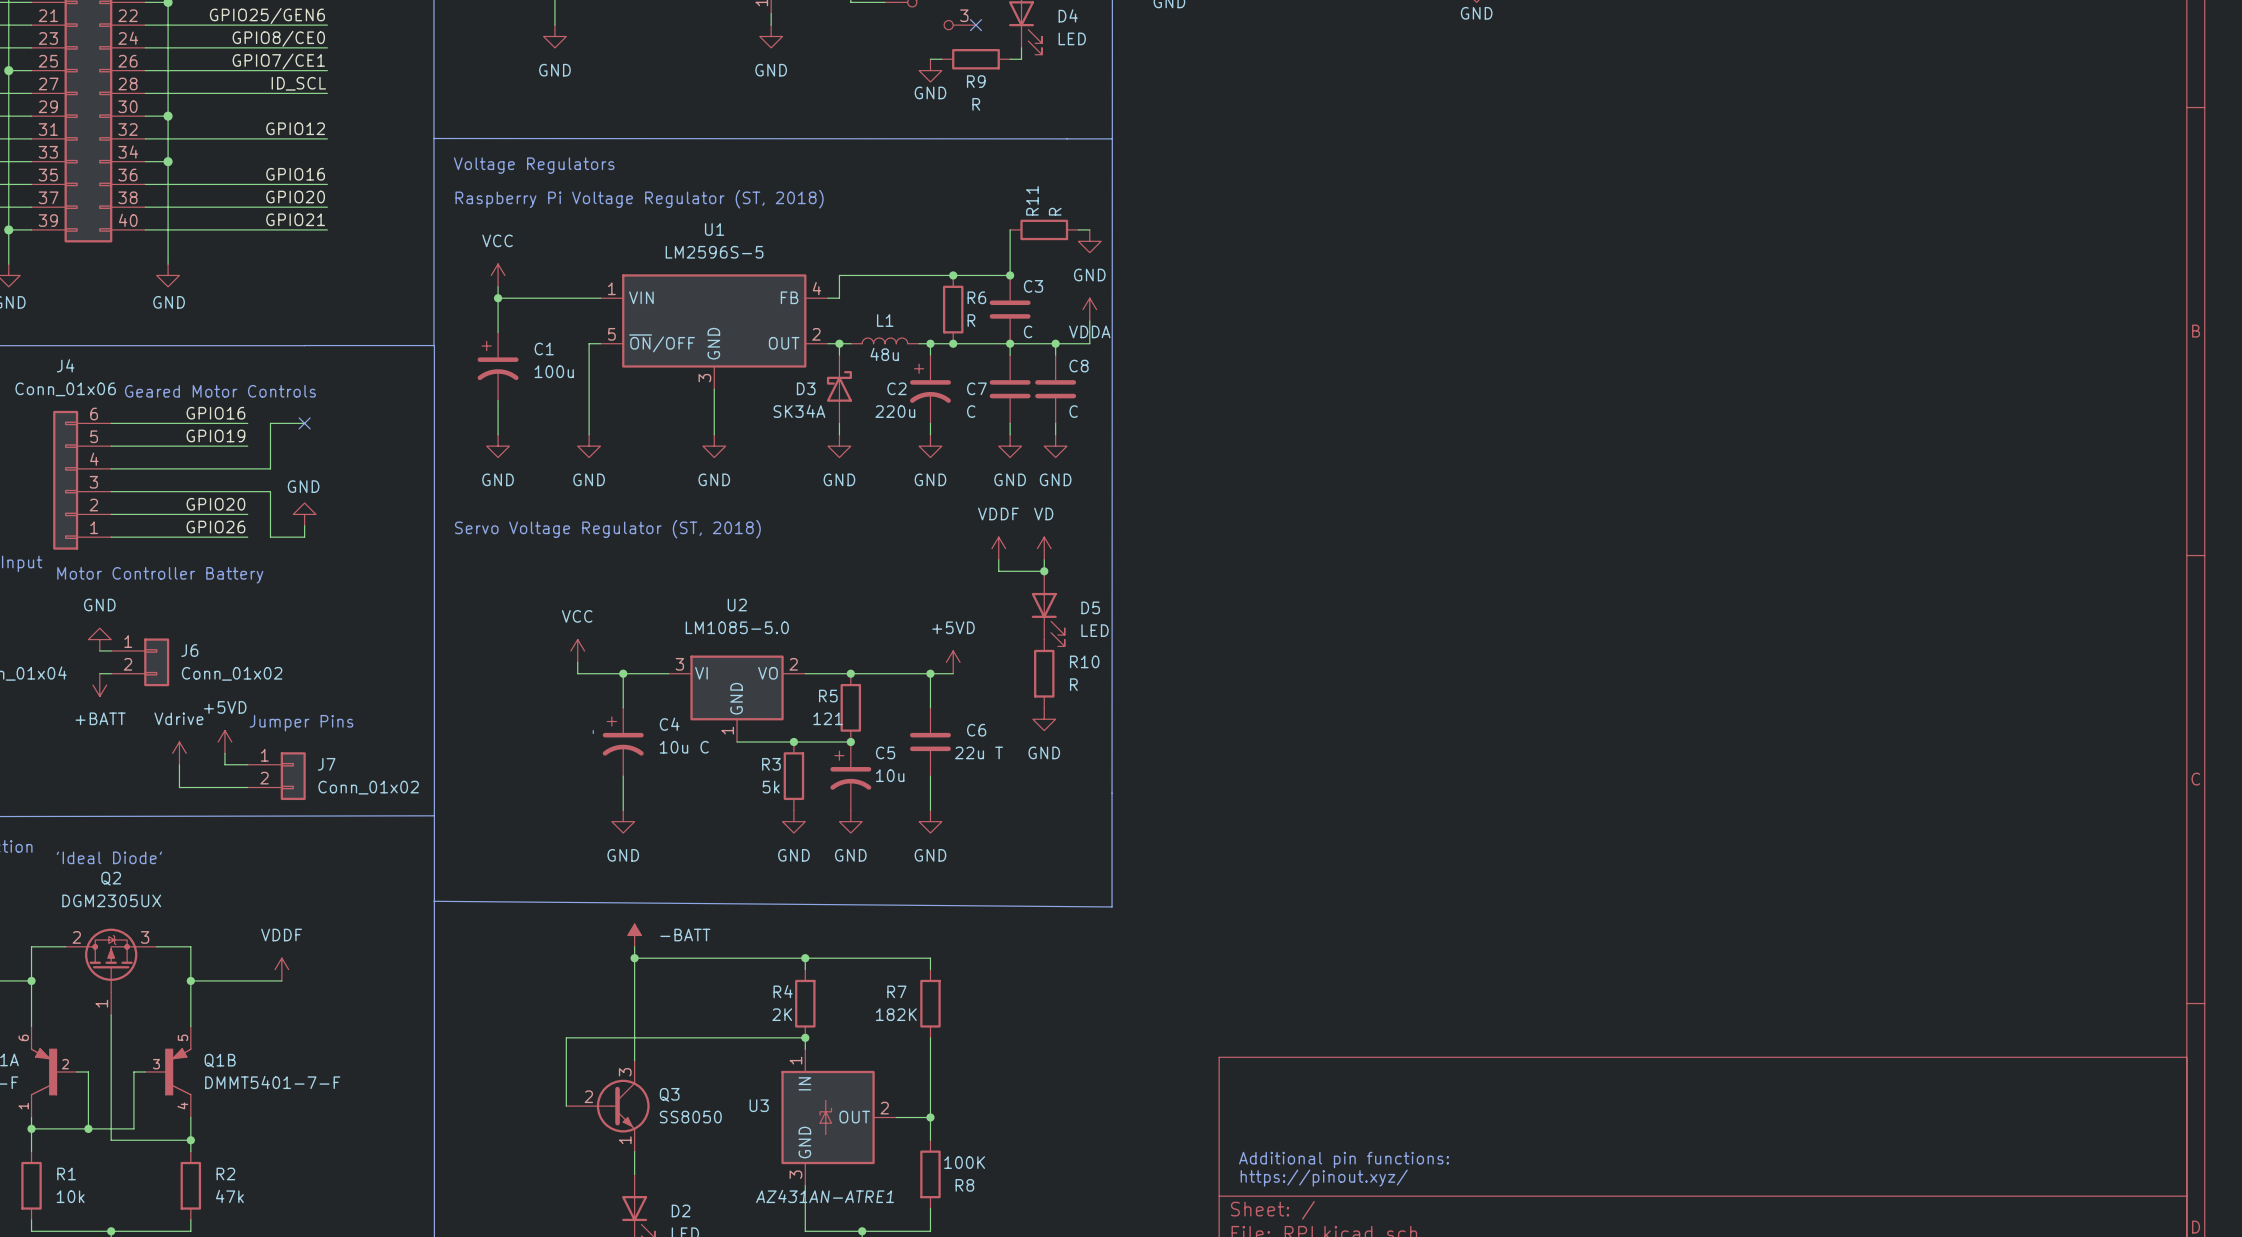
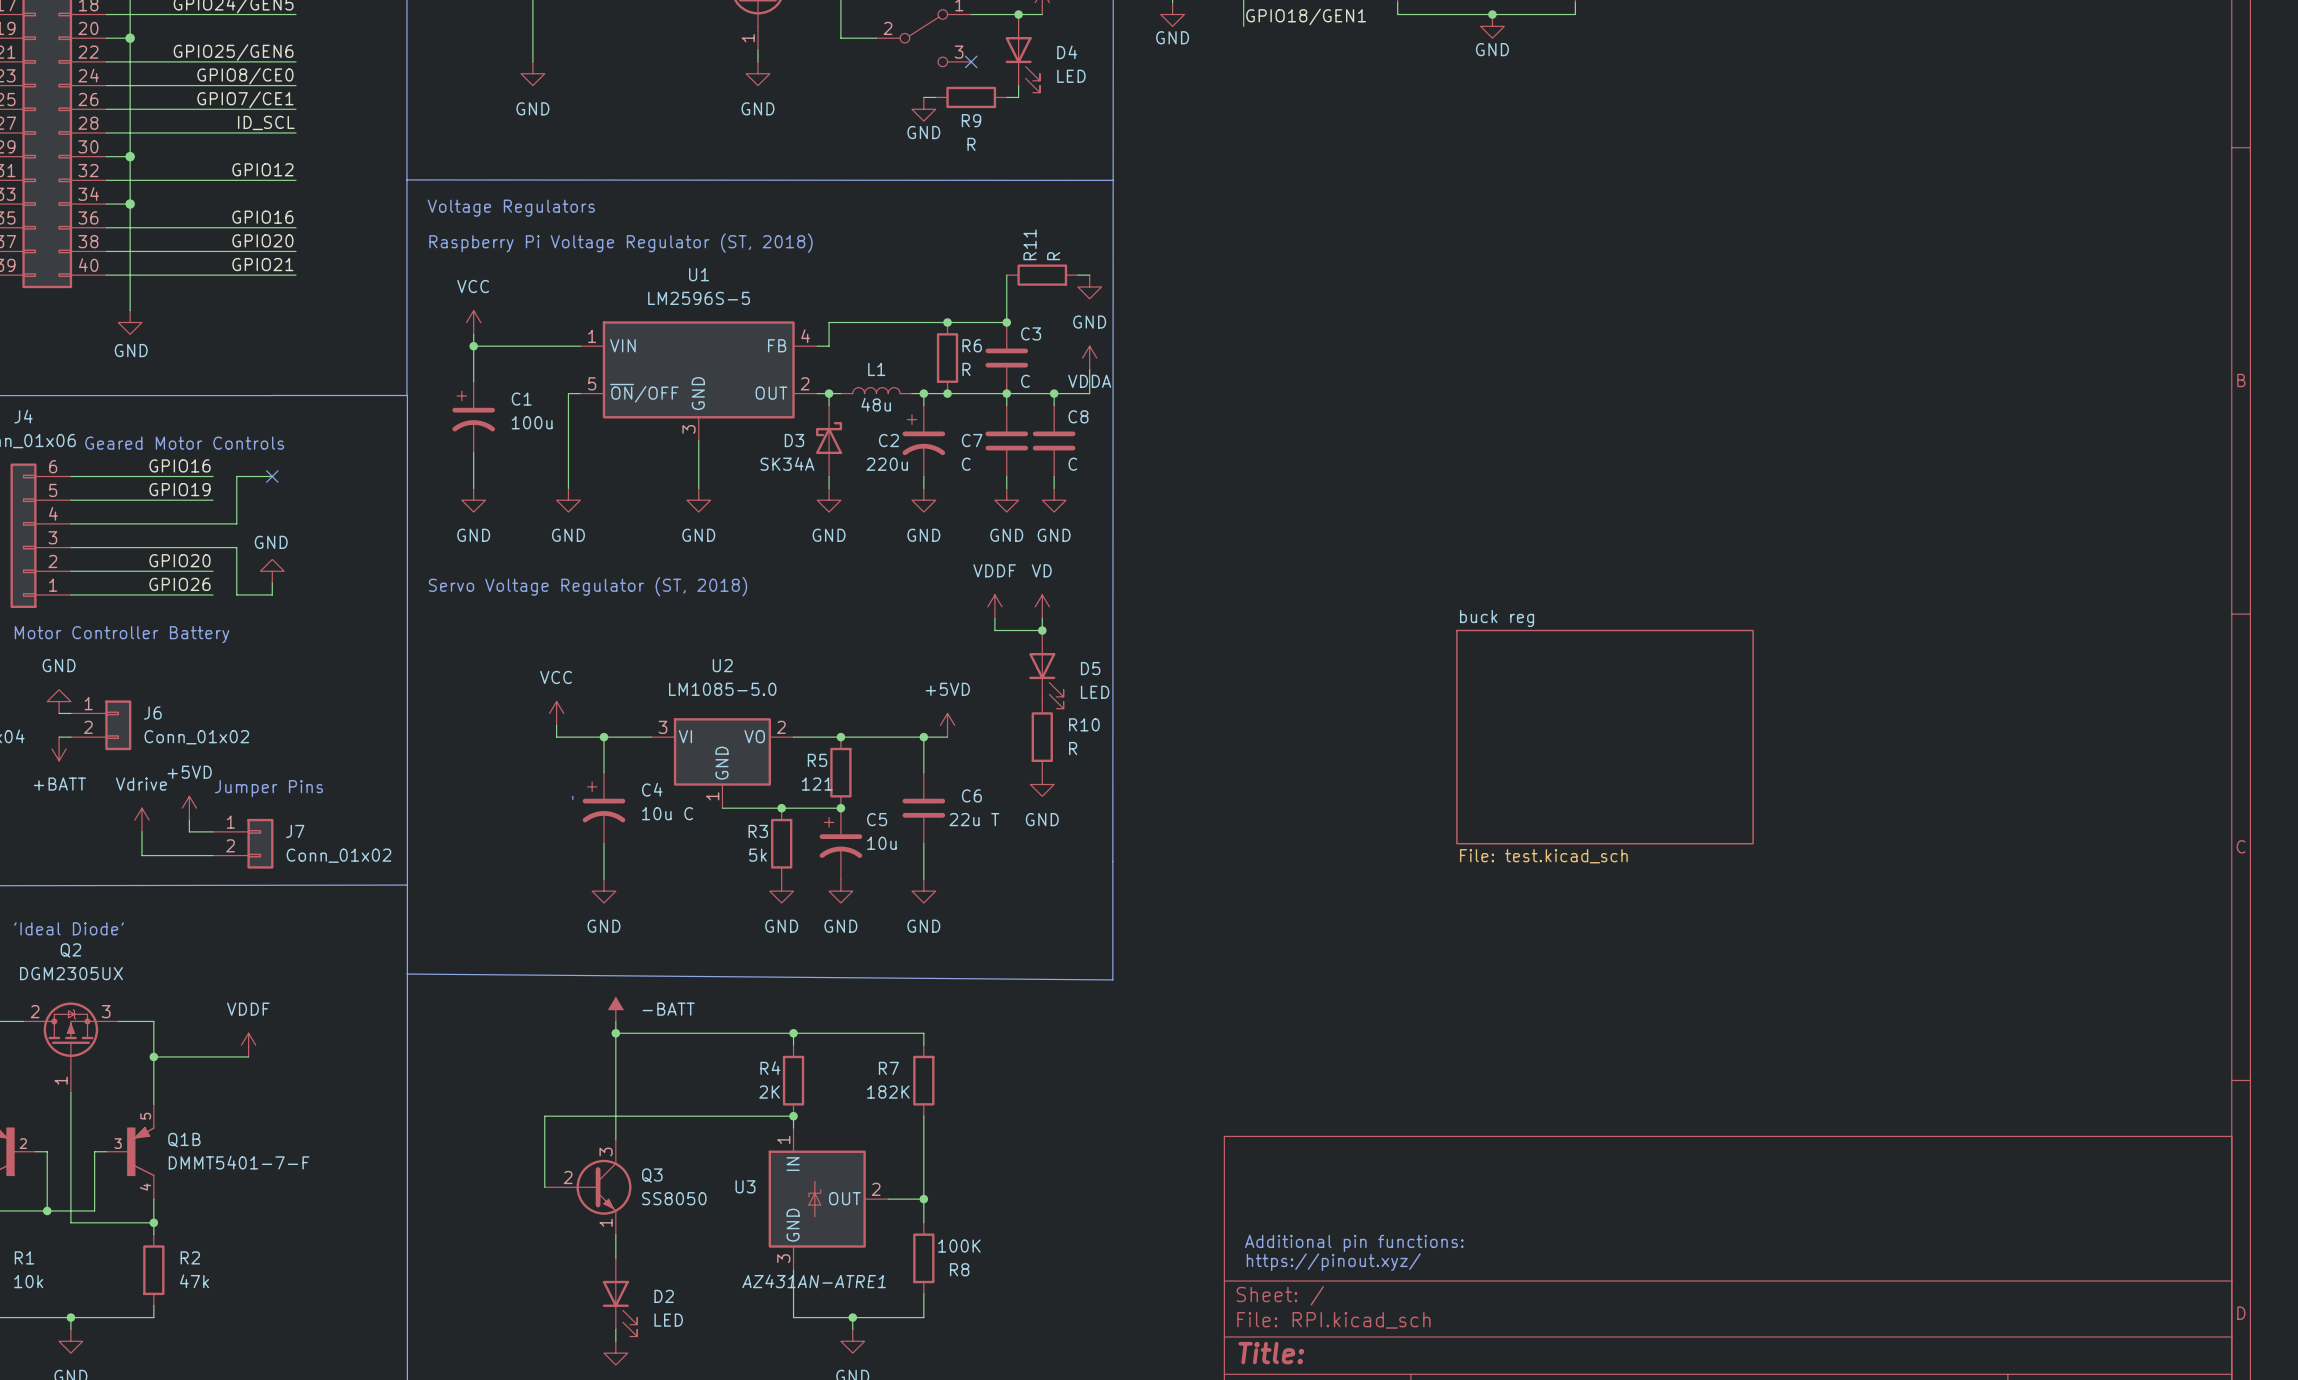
sheet buck reg: none -> File: test.kicad_sch (1604, 737)

